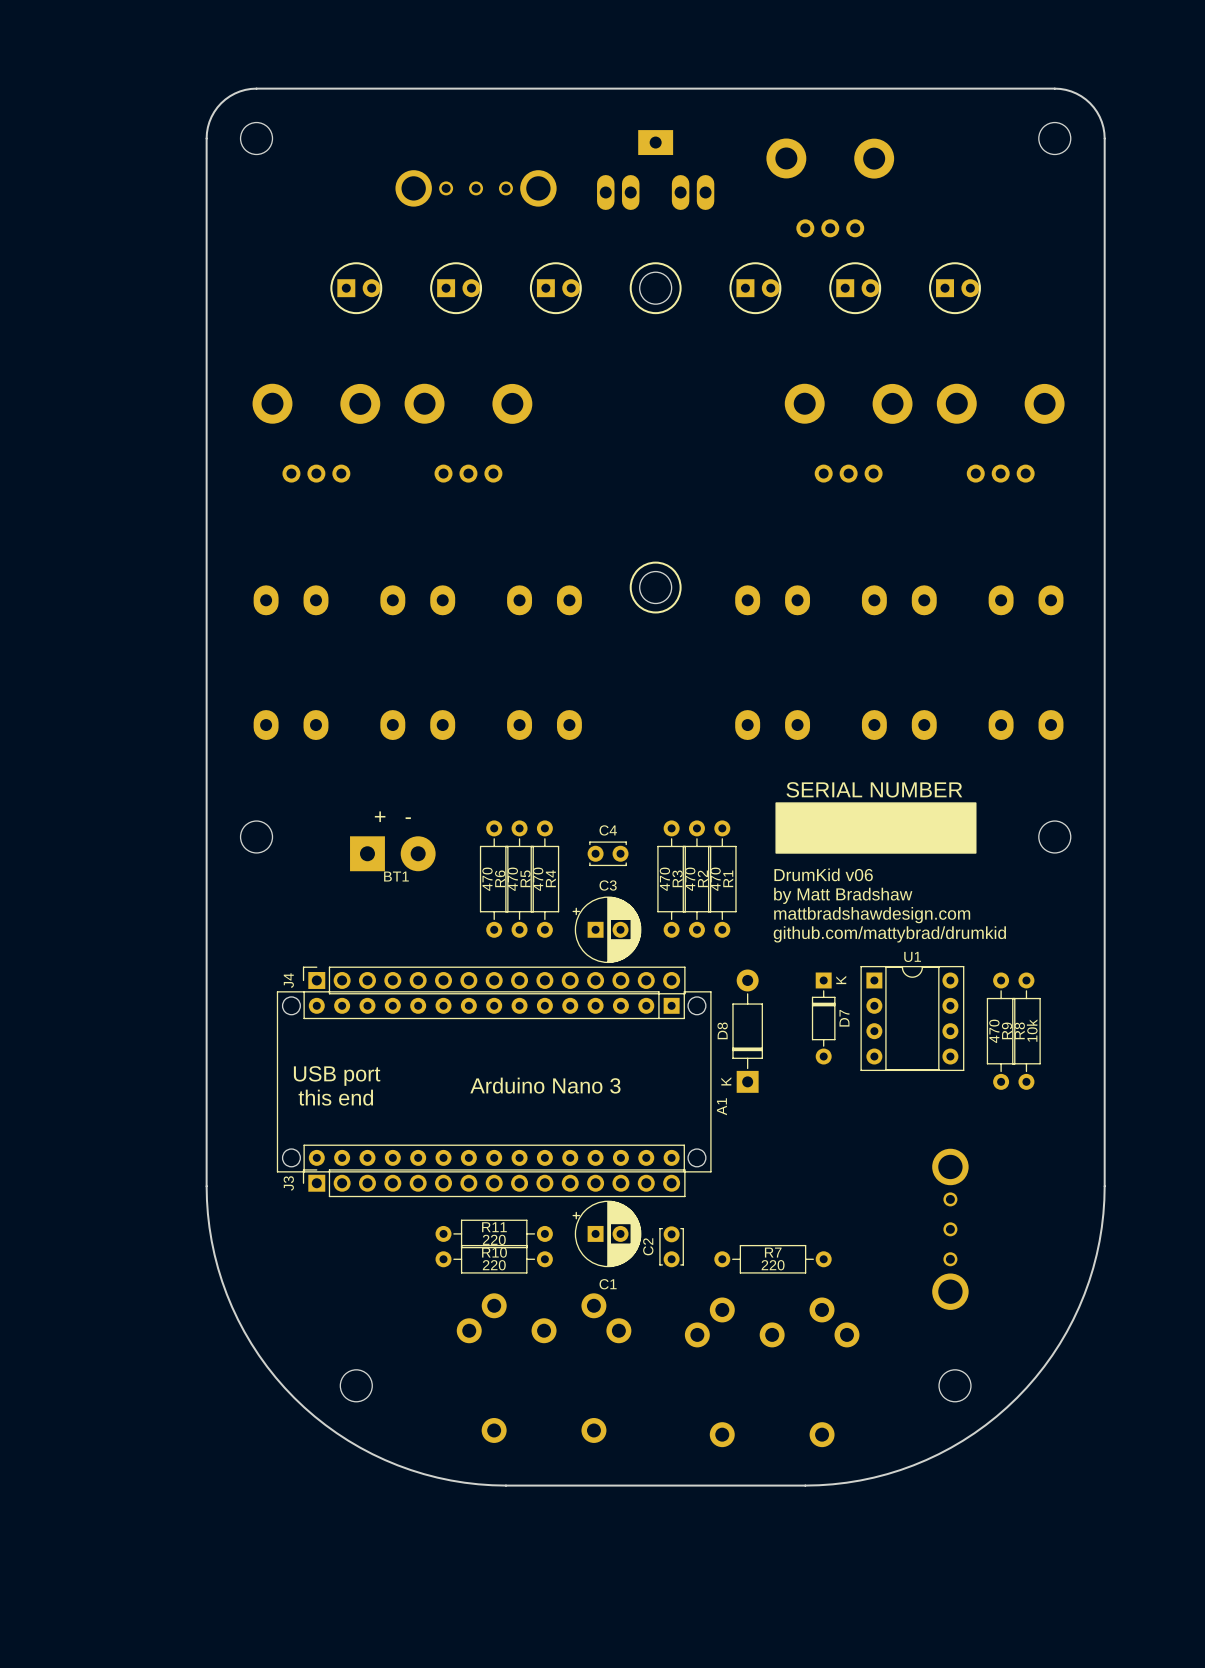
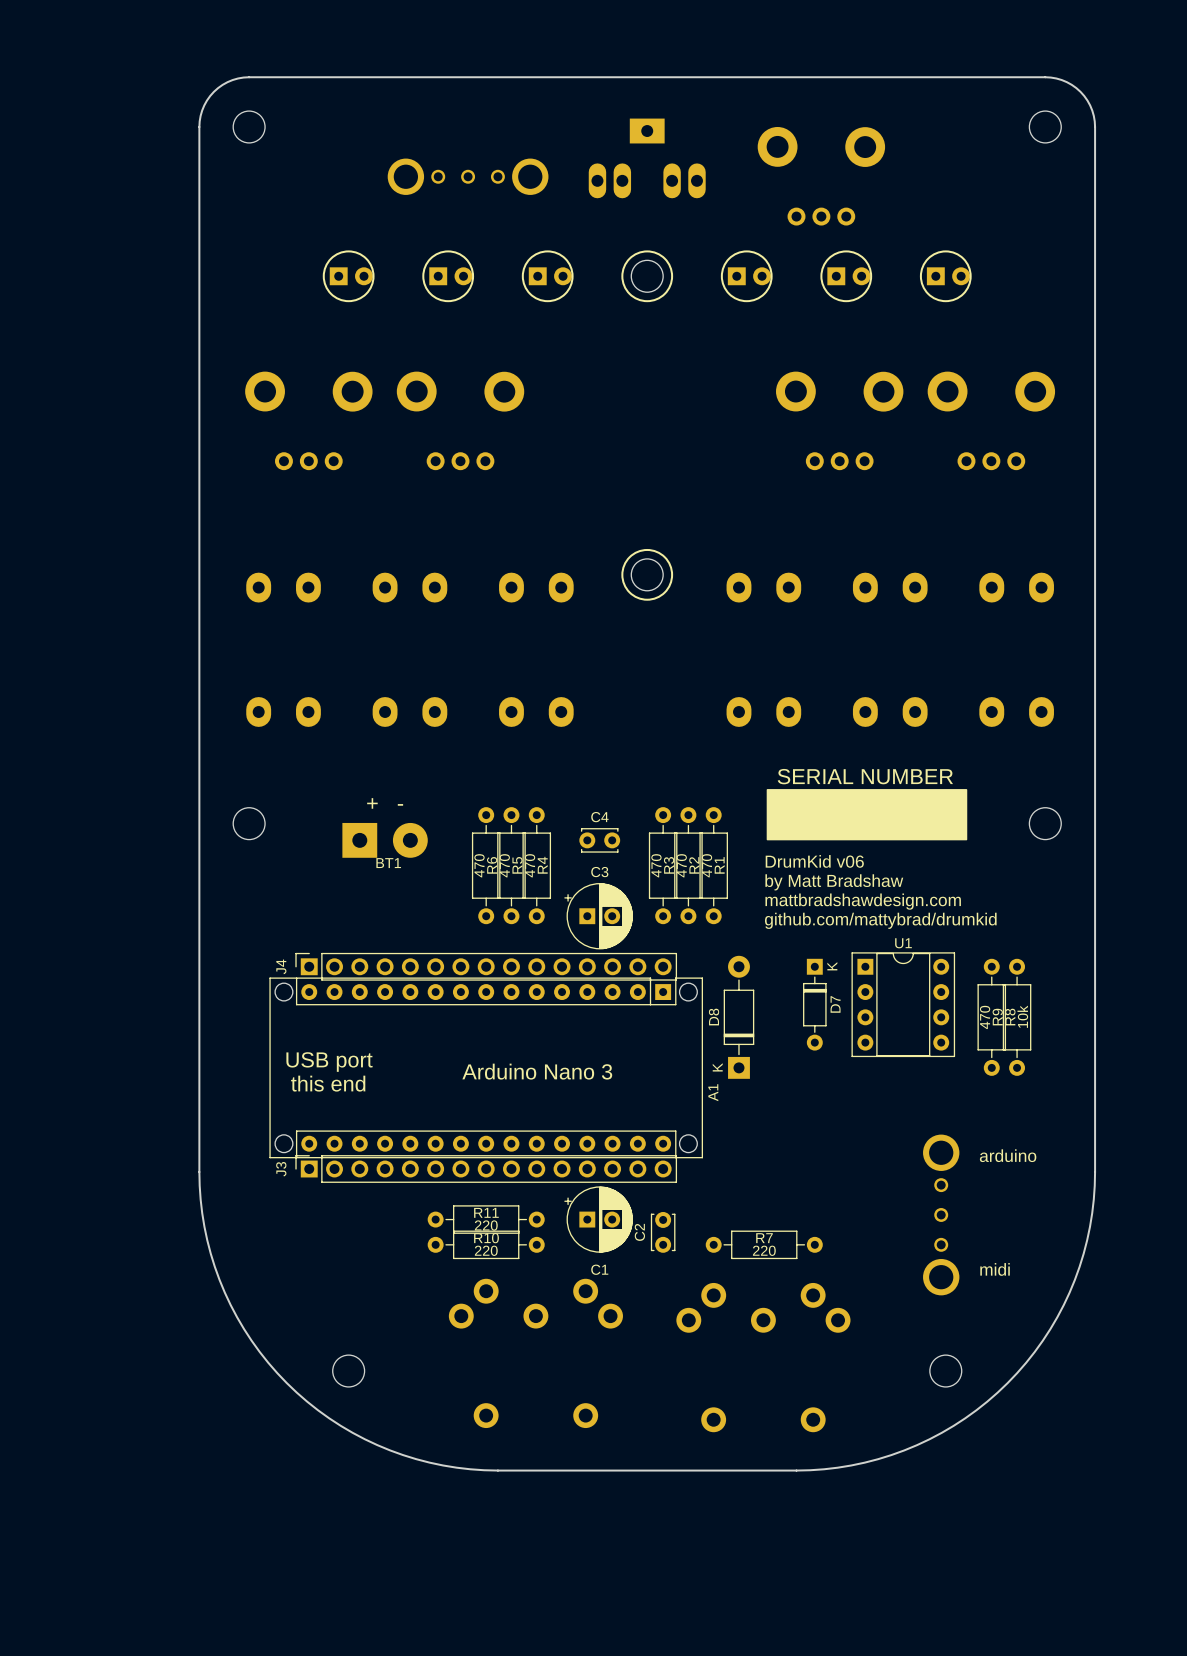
text: none -> arduino (1008, 1155)
text: none -> midi (995, 1269)

